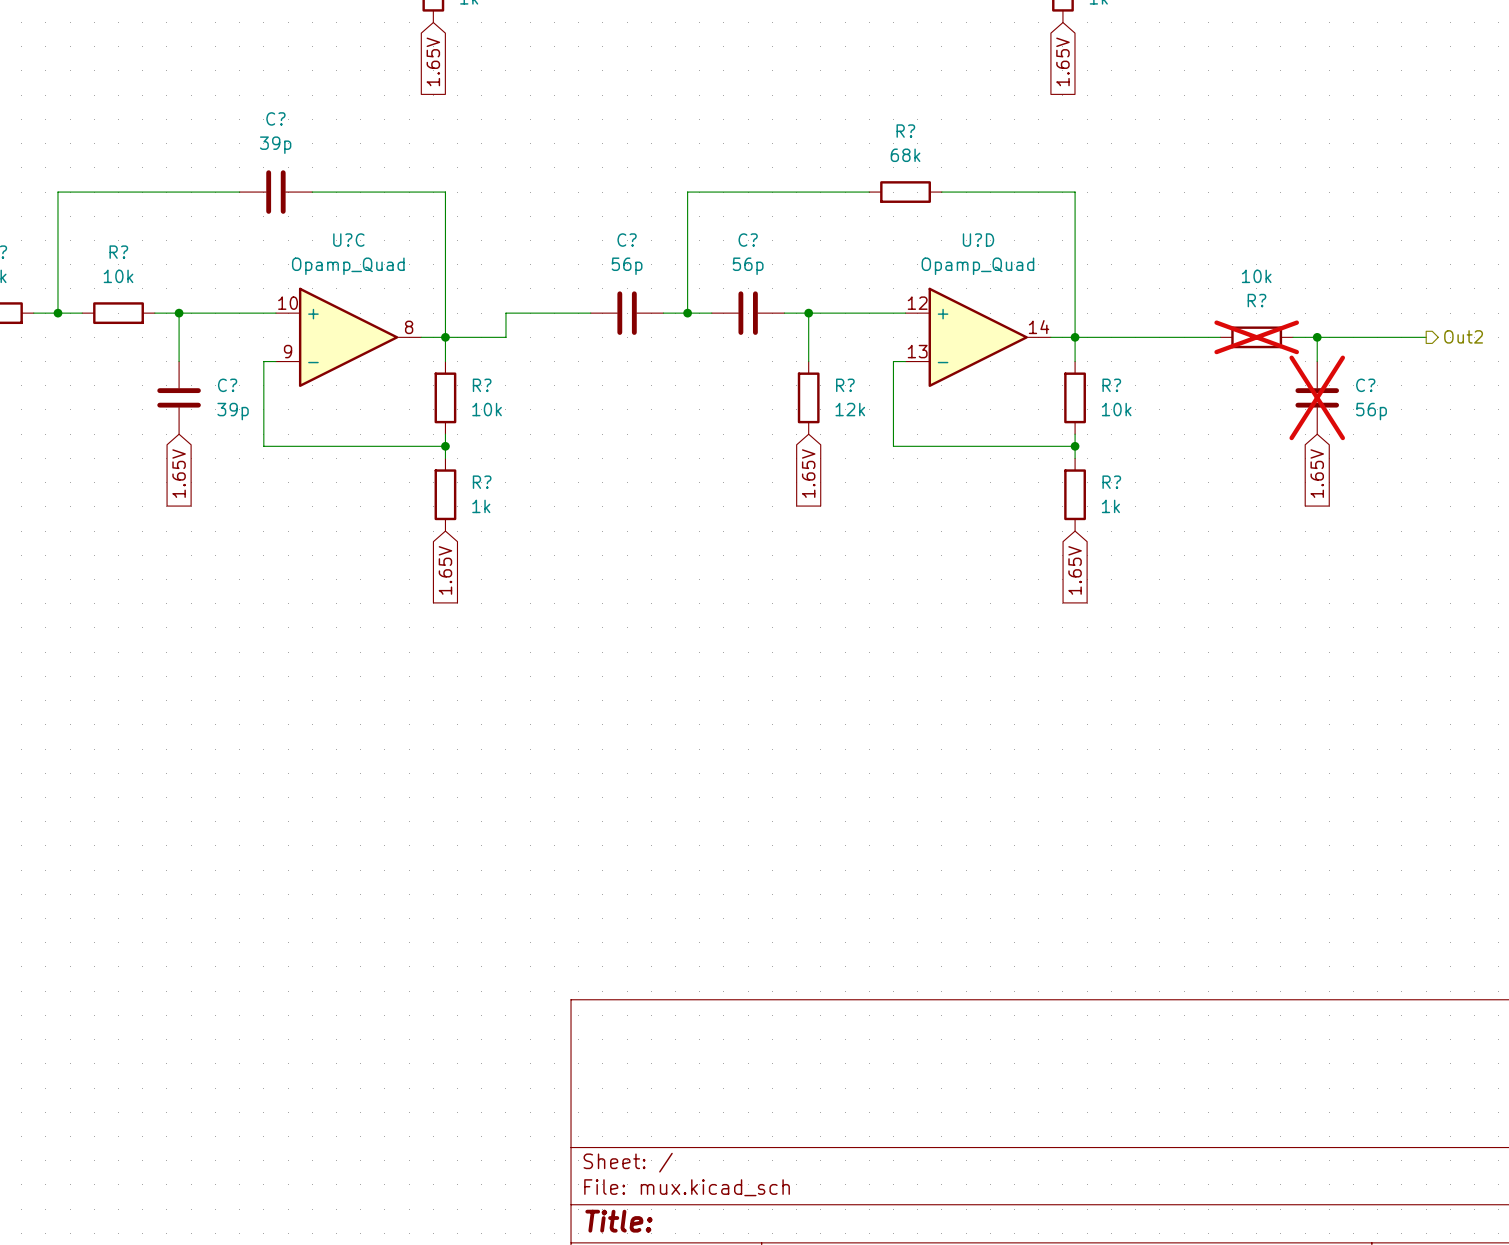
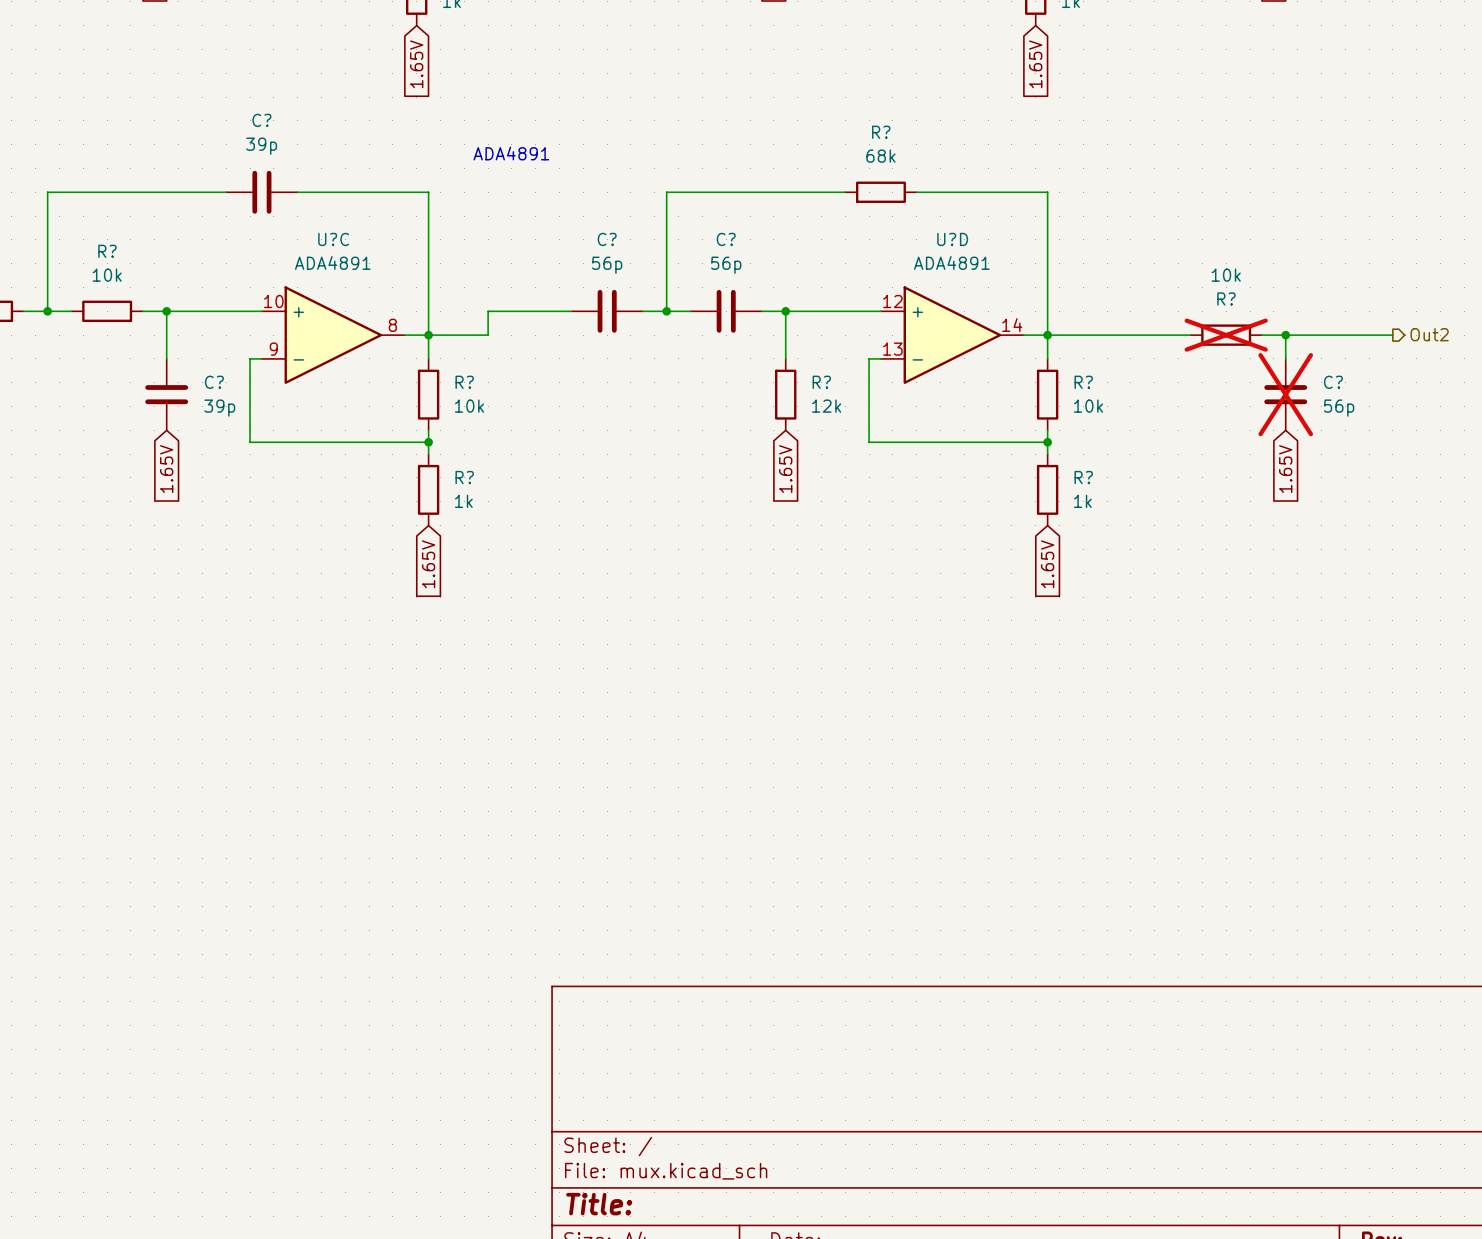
text: none -> ADA4891 (511, 153)
U?C value: Opamp_Quad (348, 266) -> ADA4891 (332, 262)
U?D value: Opamp_Quad (977, 266) -> ADA4891 (951, 262)

